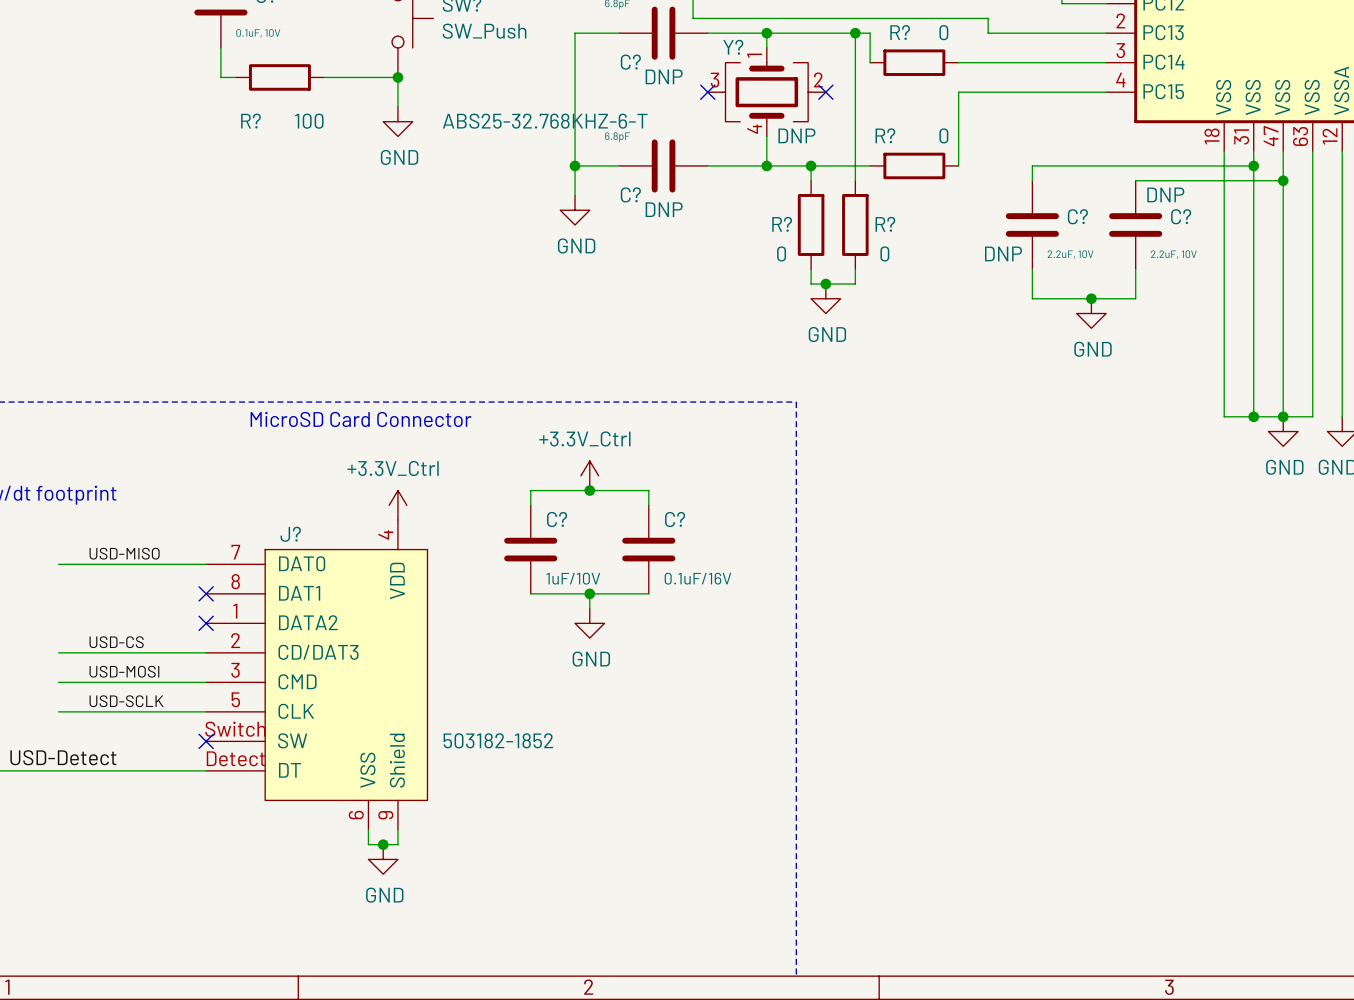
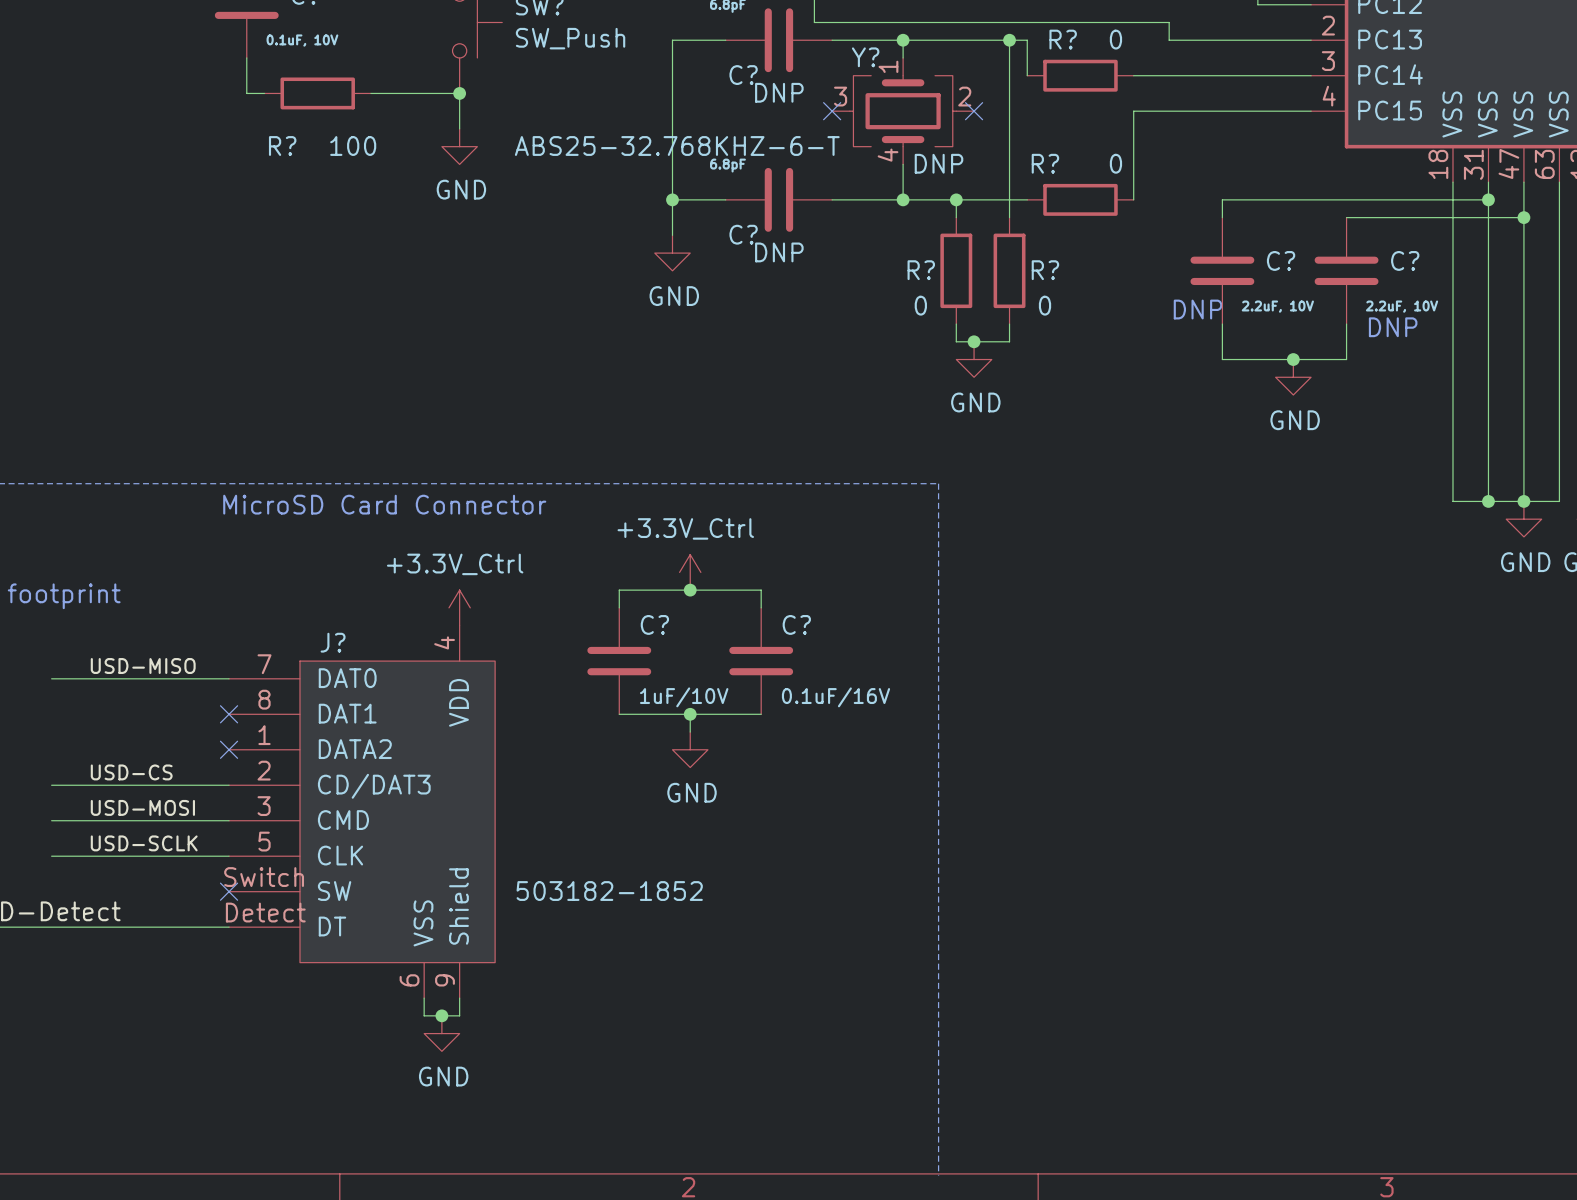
C? text: DNP (1165, 194) -> none
C? text: DNP (1003, 253) -> none
text: none -> DNP (1198, 309)
text: none -> DNP (1393, 327)

